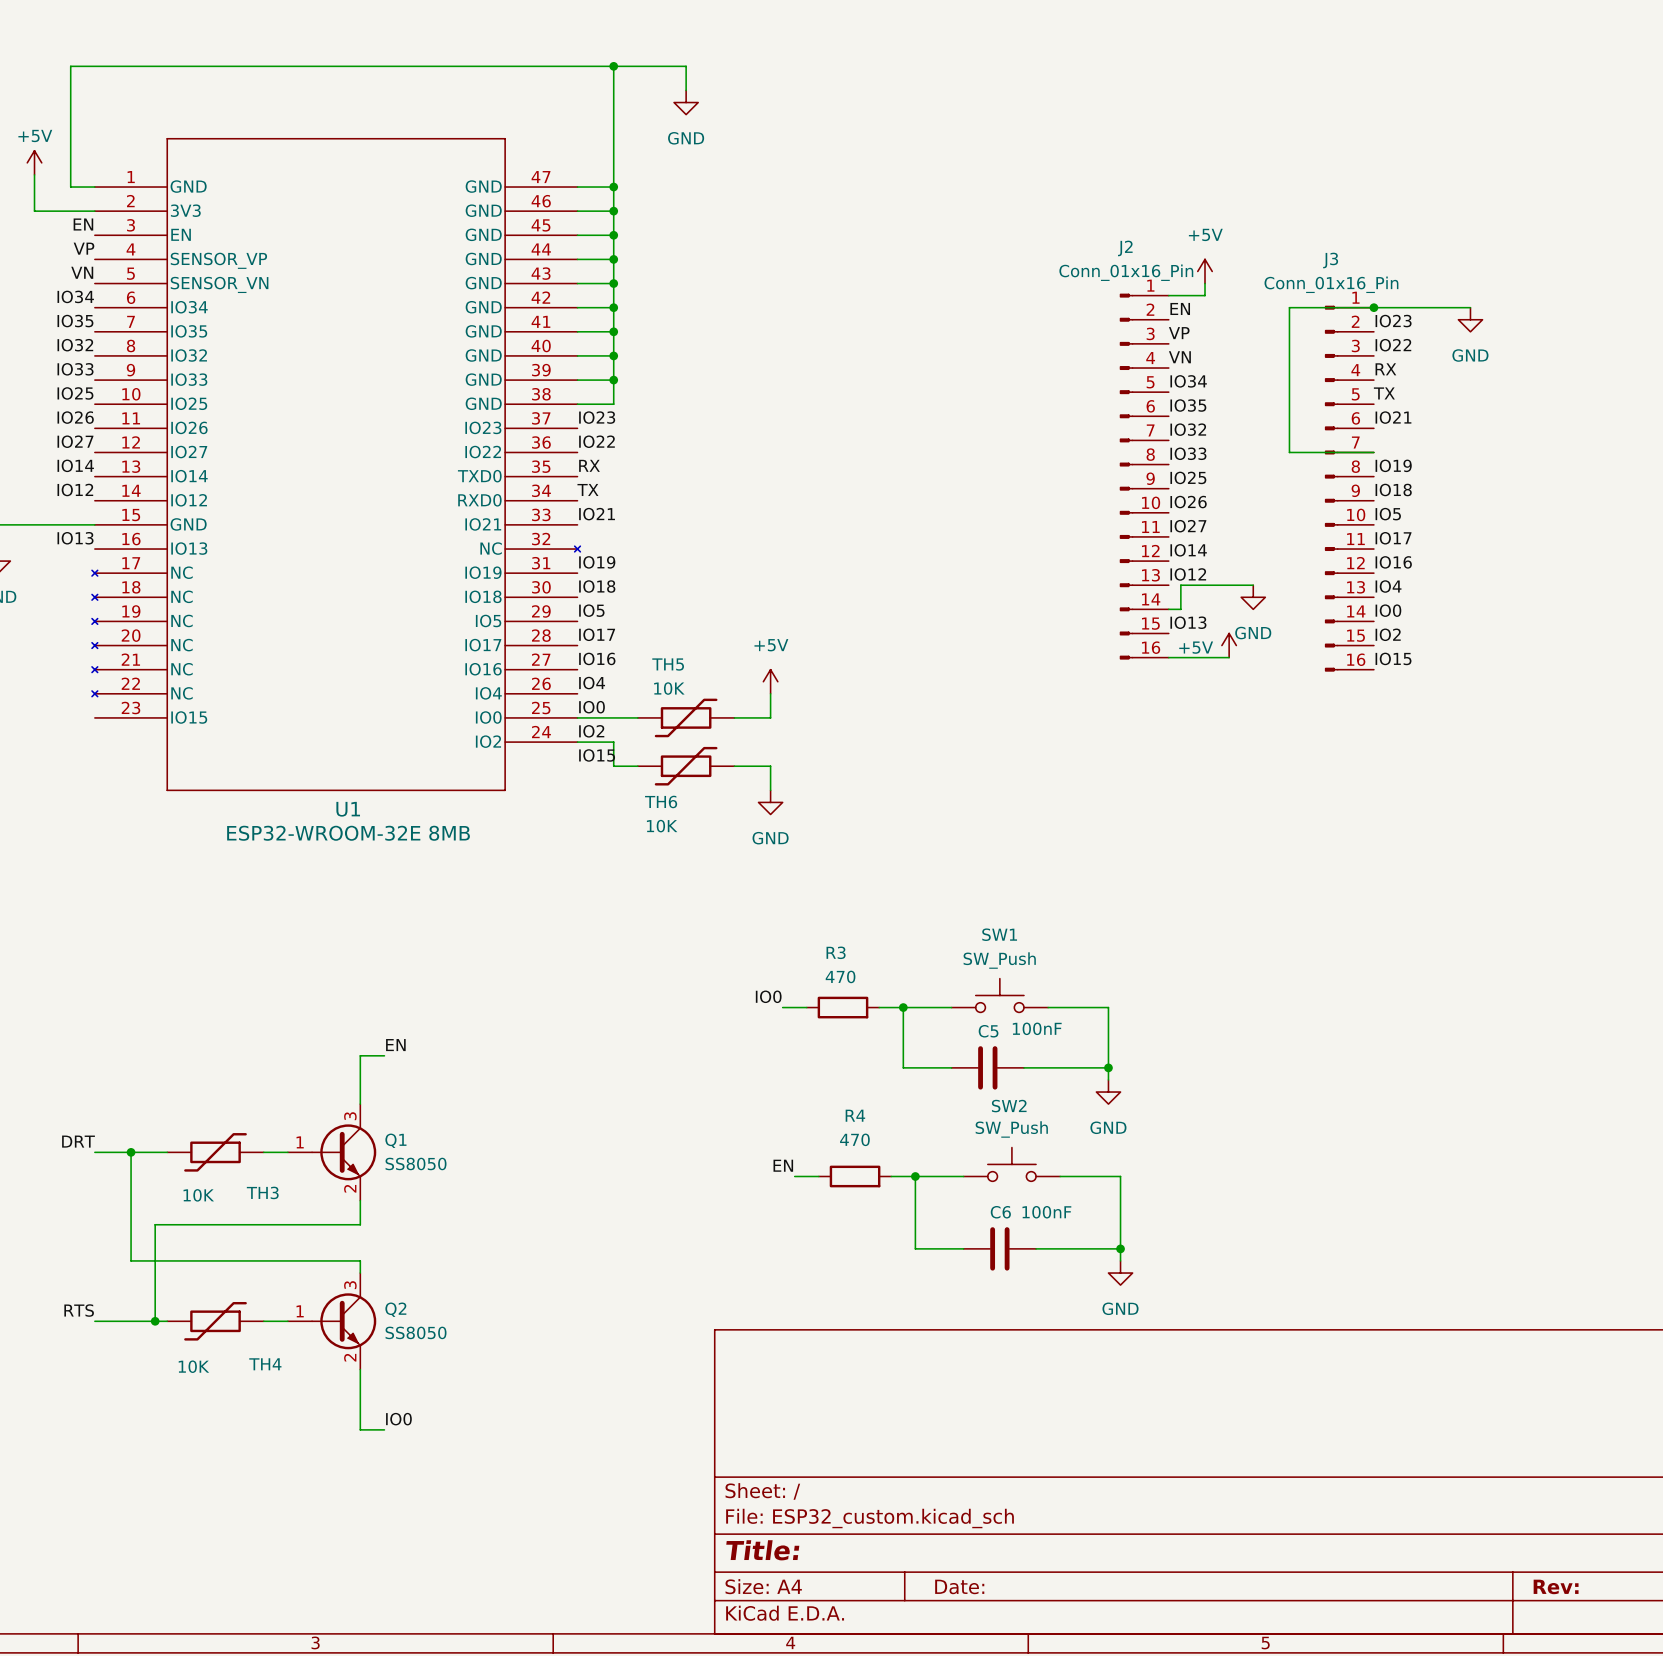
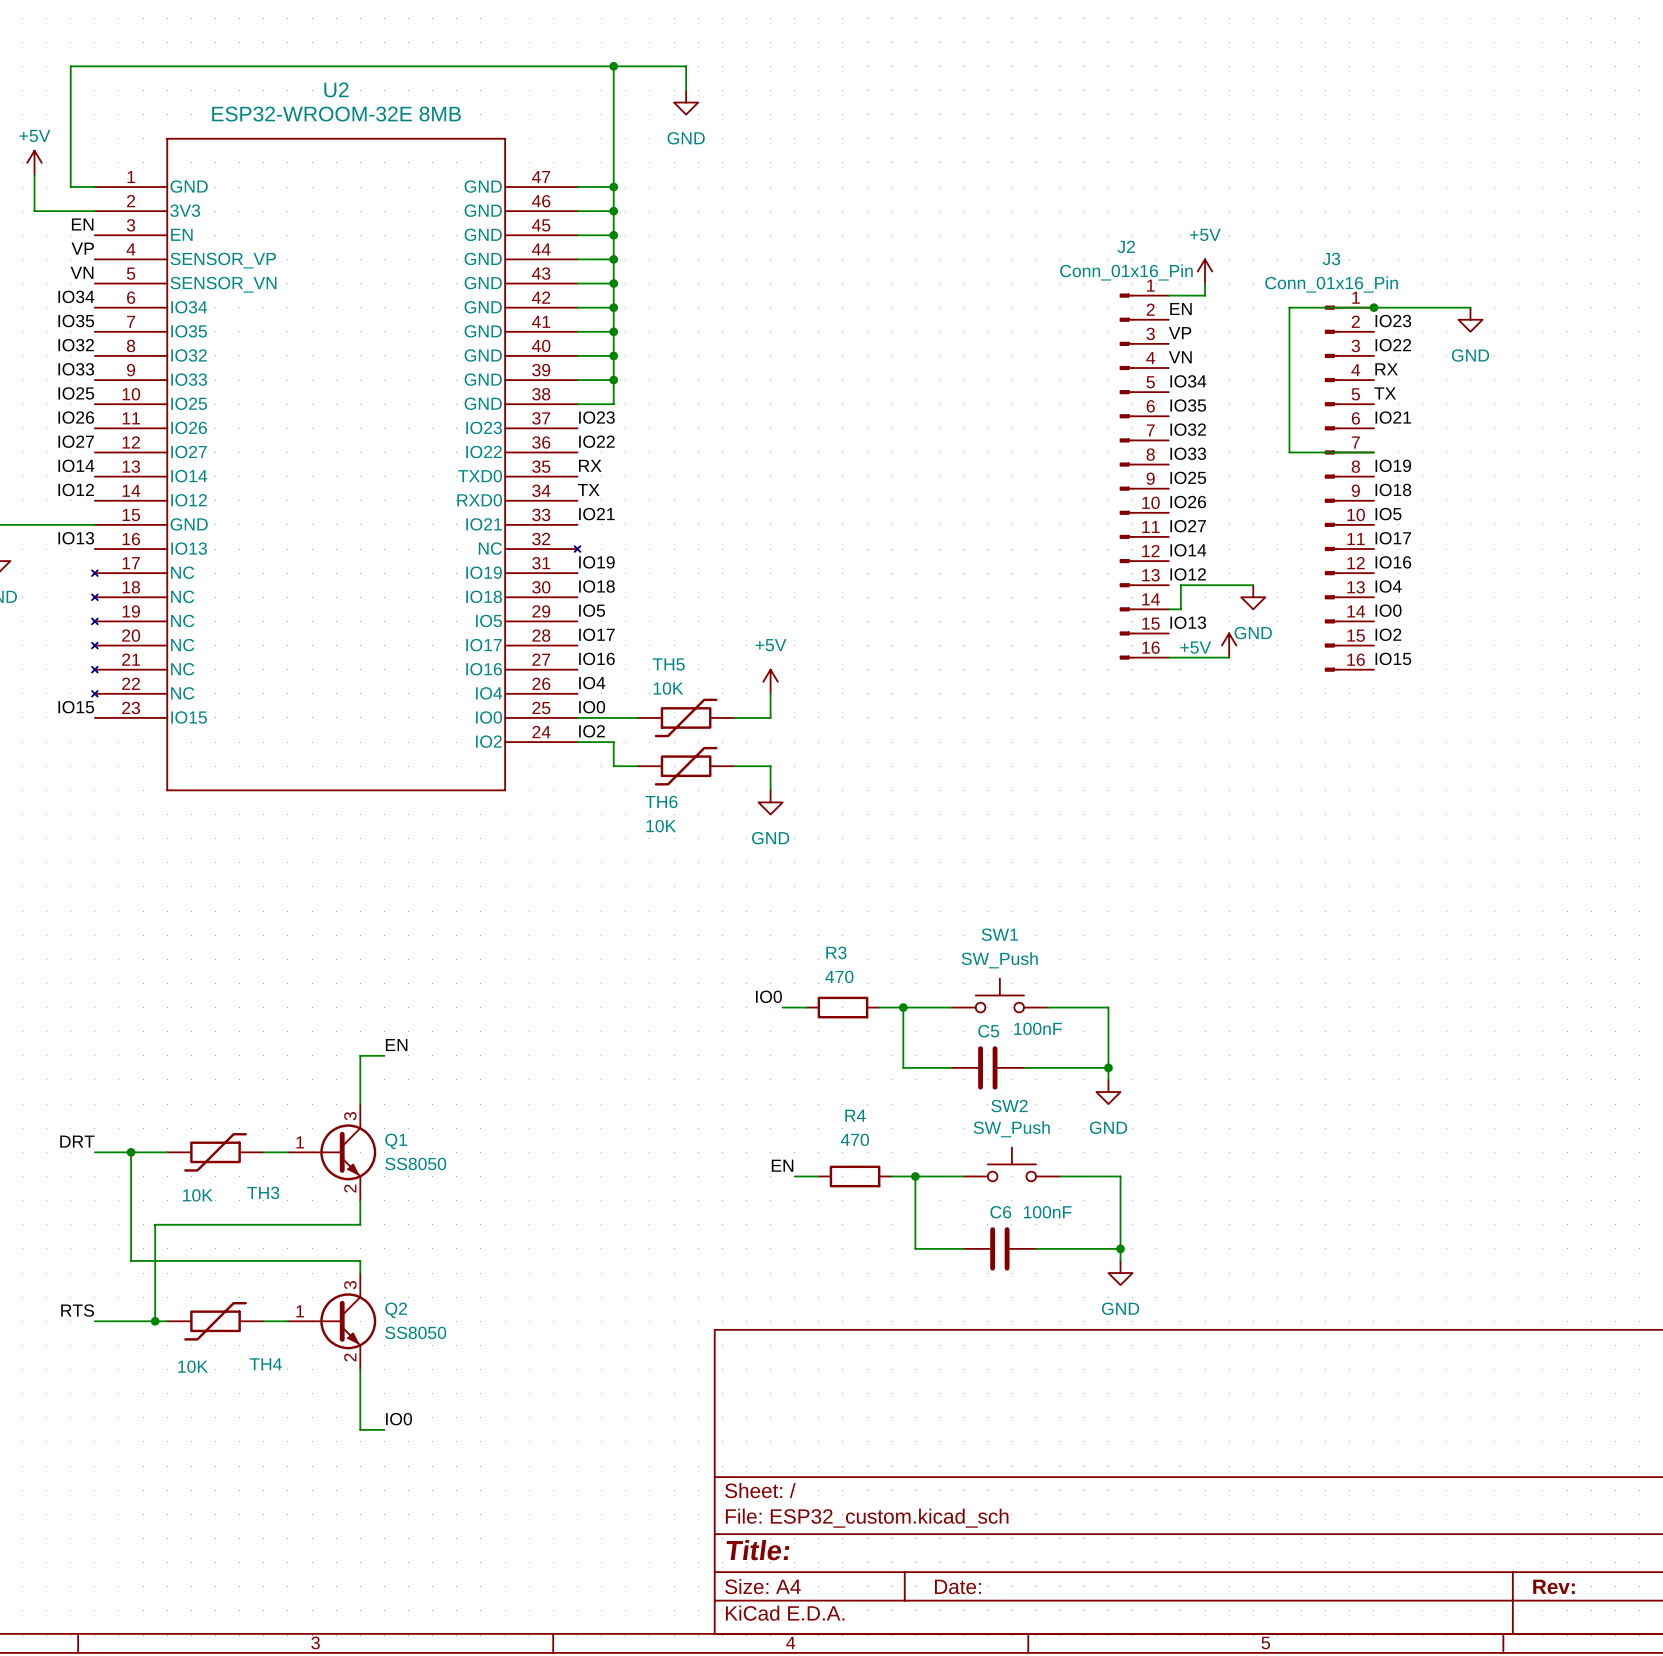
label: none -> IO15 (76, 707)
label: IO15 (597, 755) -> none
U1 name: U1 (348, 809) -> U2 (336, 89)
U1 value position: ESP32-WROOM-32E 8MB (348, 833) -> ESP32-WROOM-32E 8MB (336, 114)

